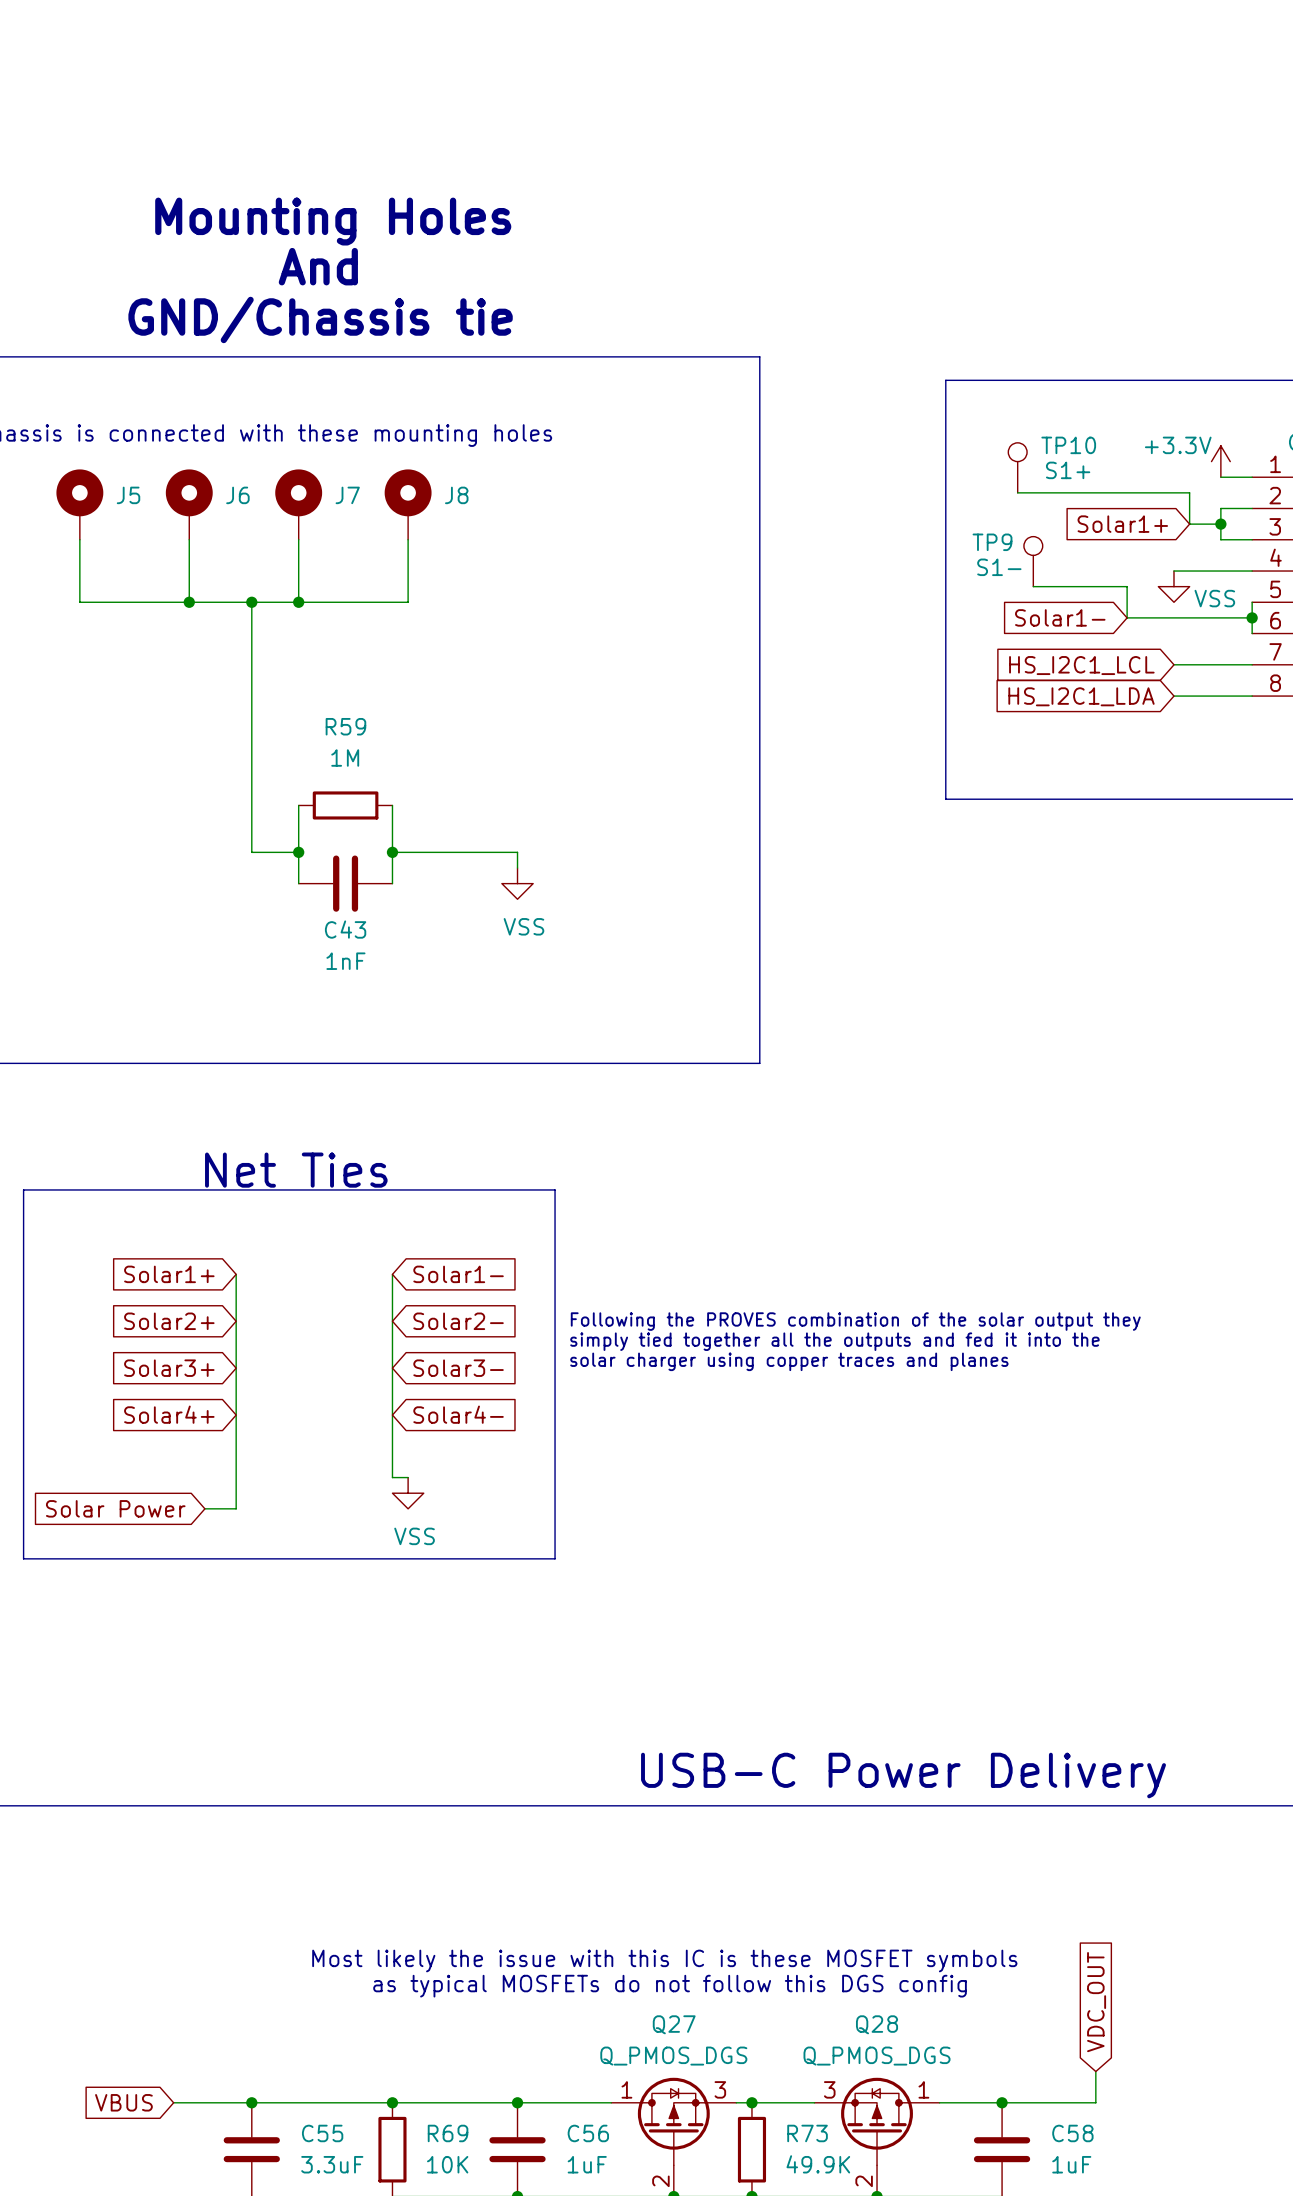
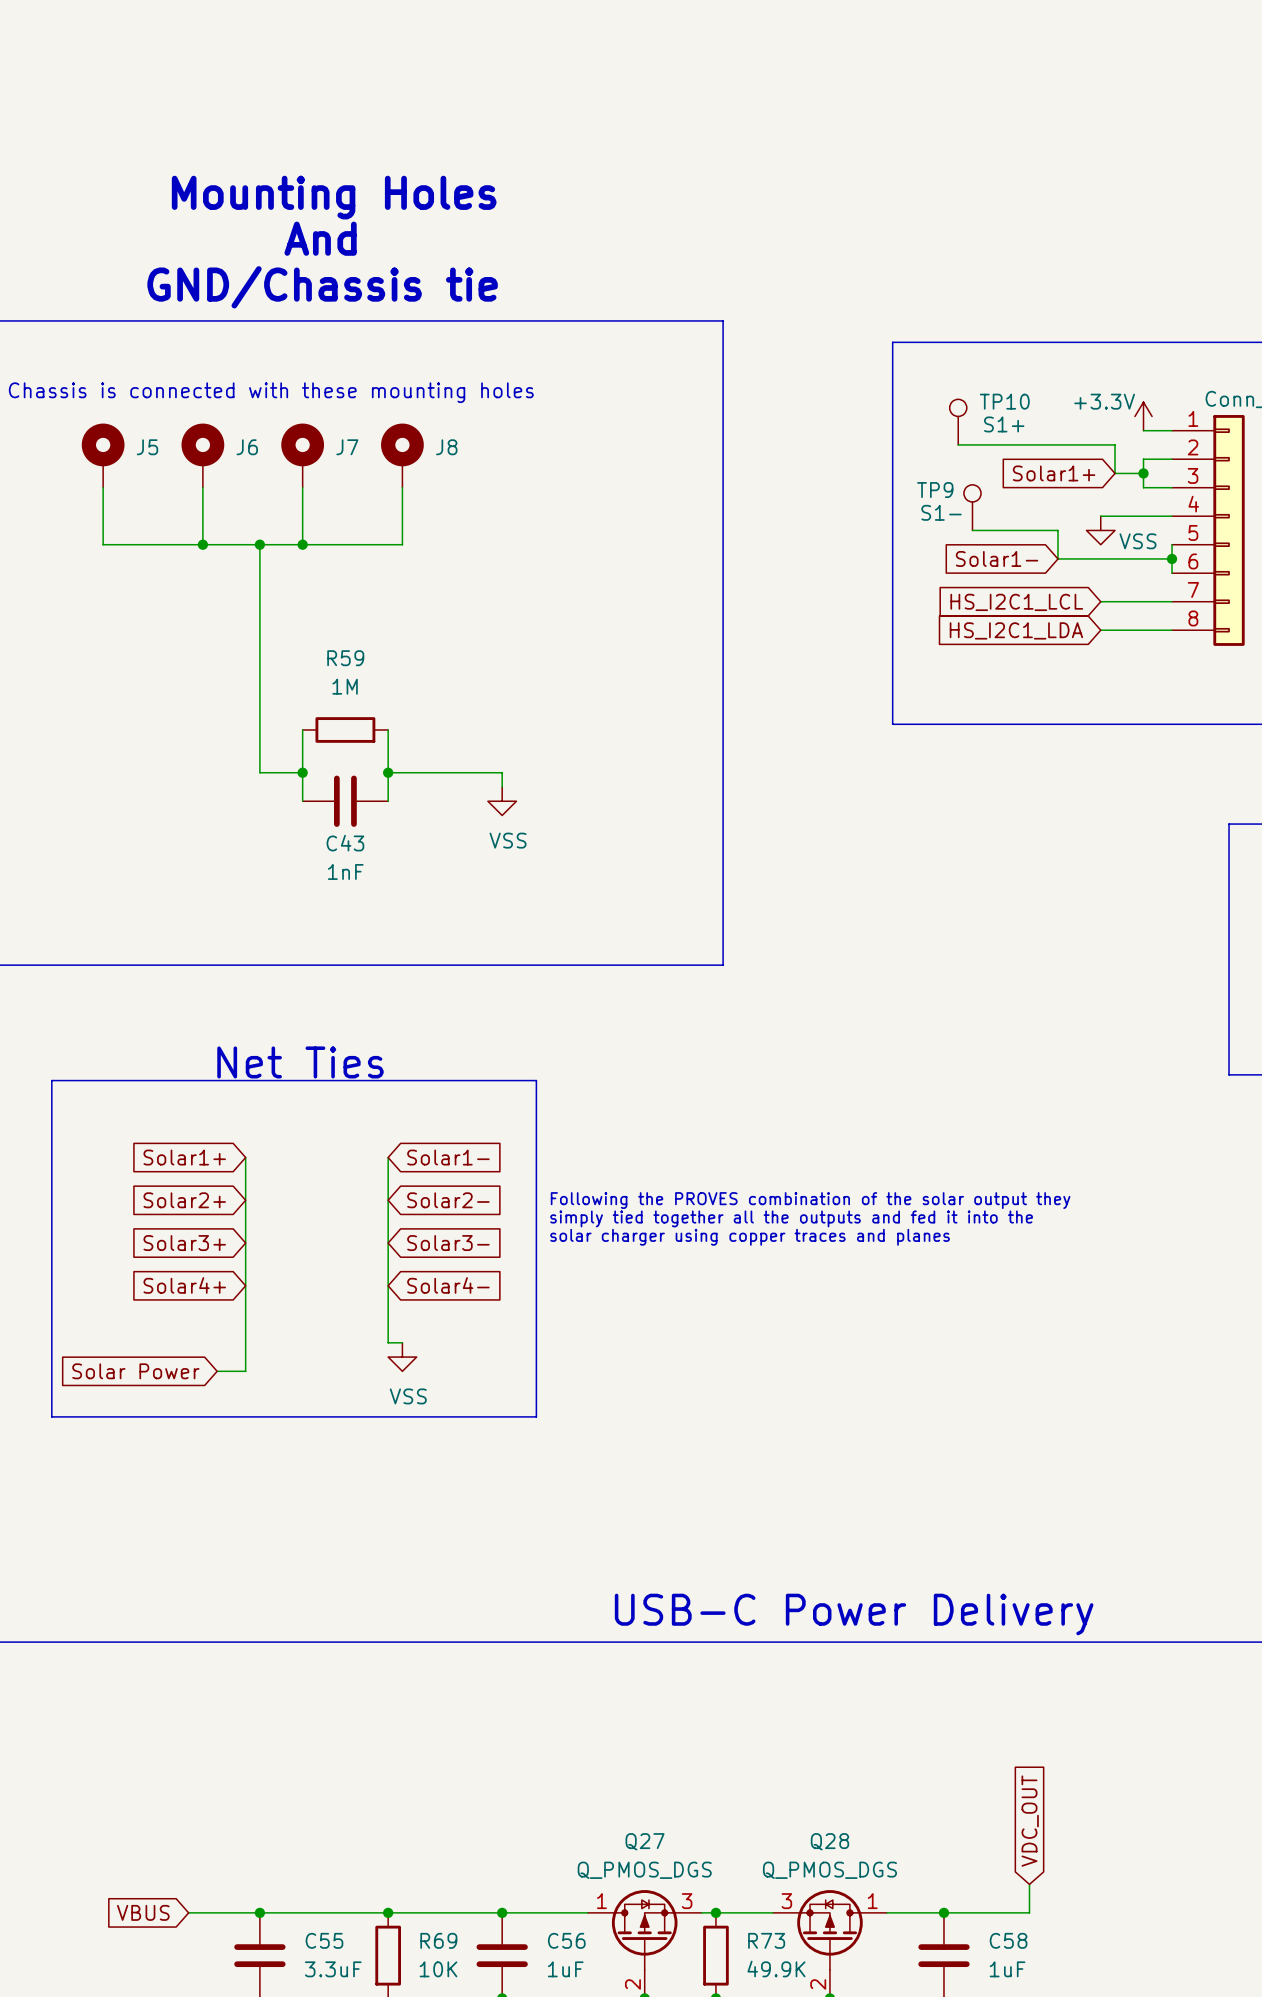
text: Most likely the issue with this IC is these MOSFET symbols (664, 1960) -> none
text: as typical MOSFETs do not follow this DGS config (670, 1986) -> none

